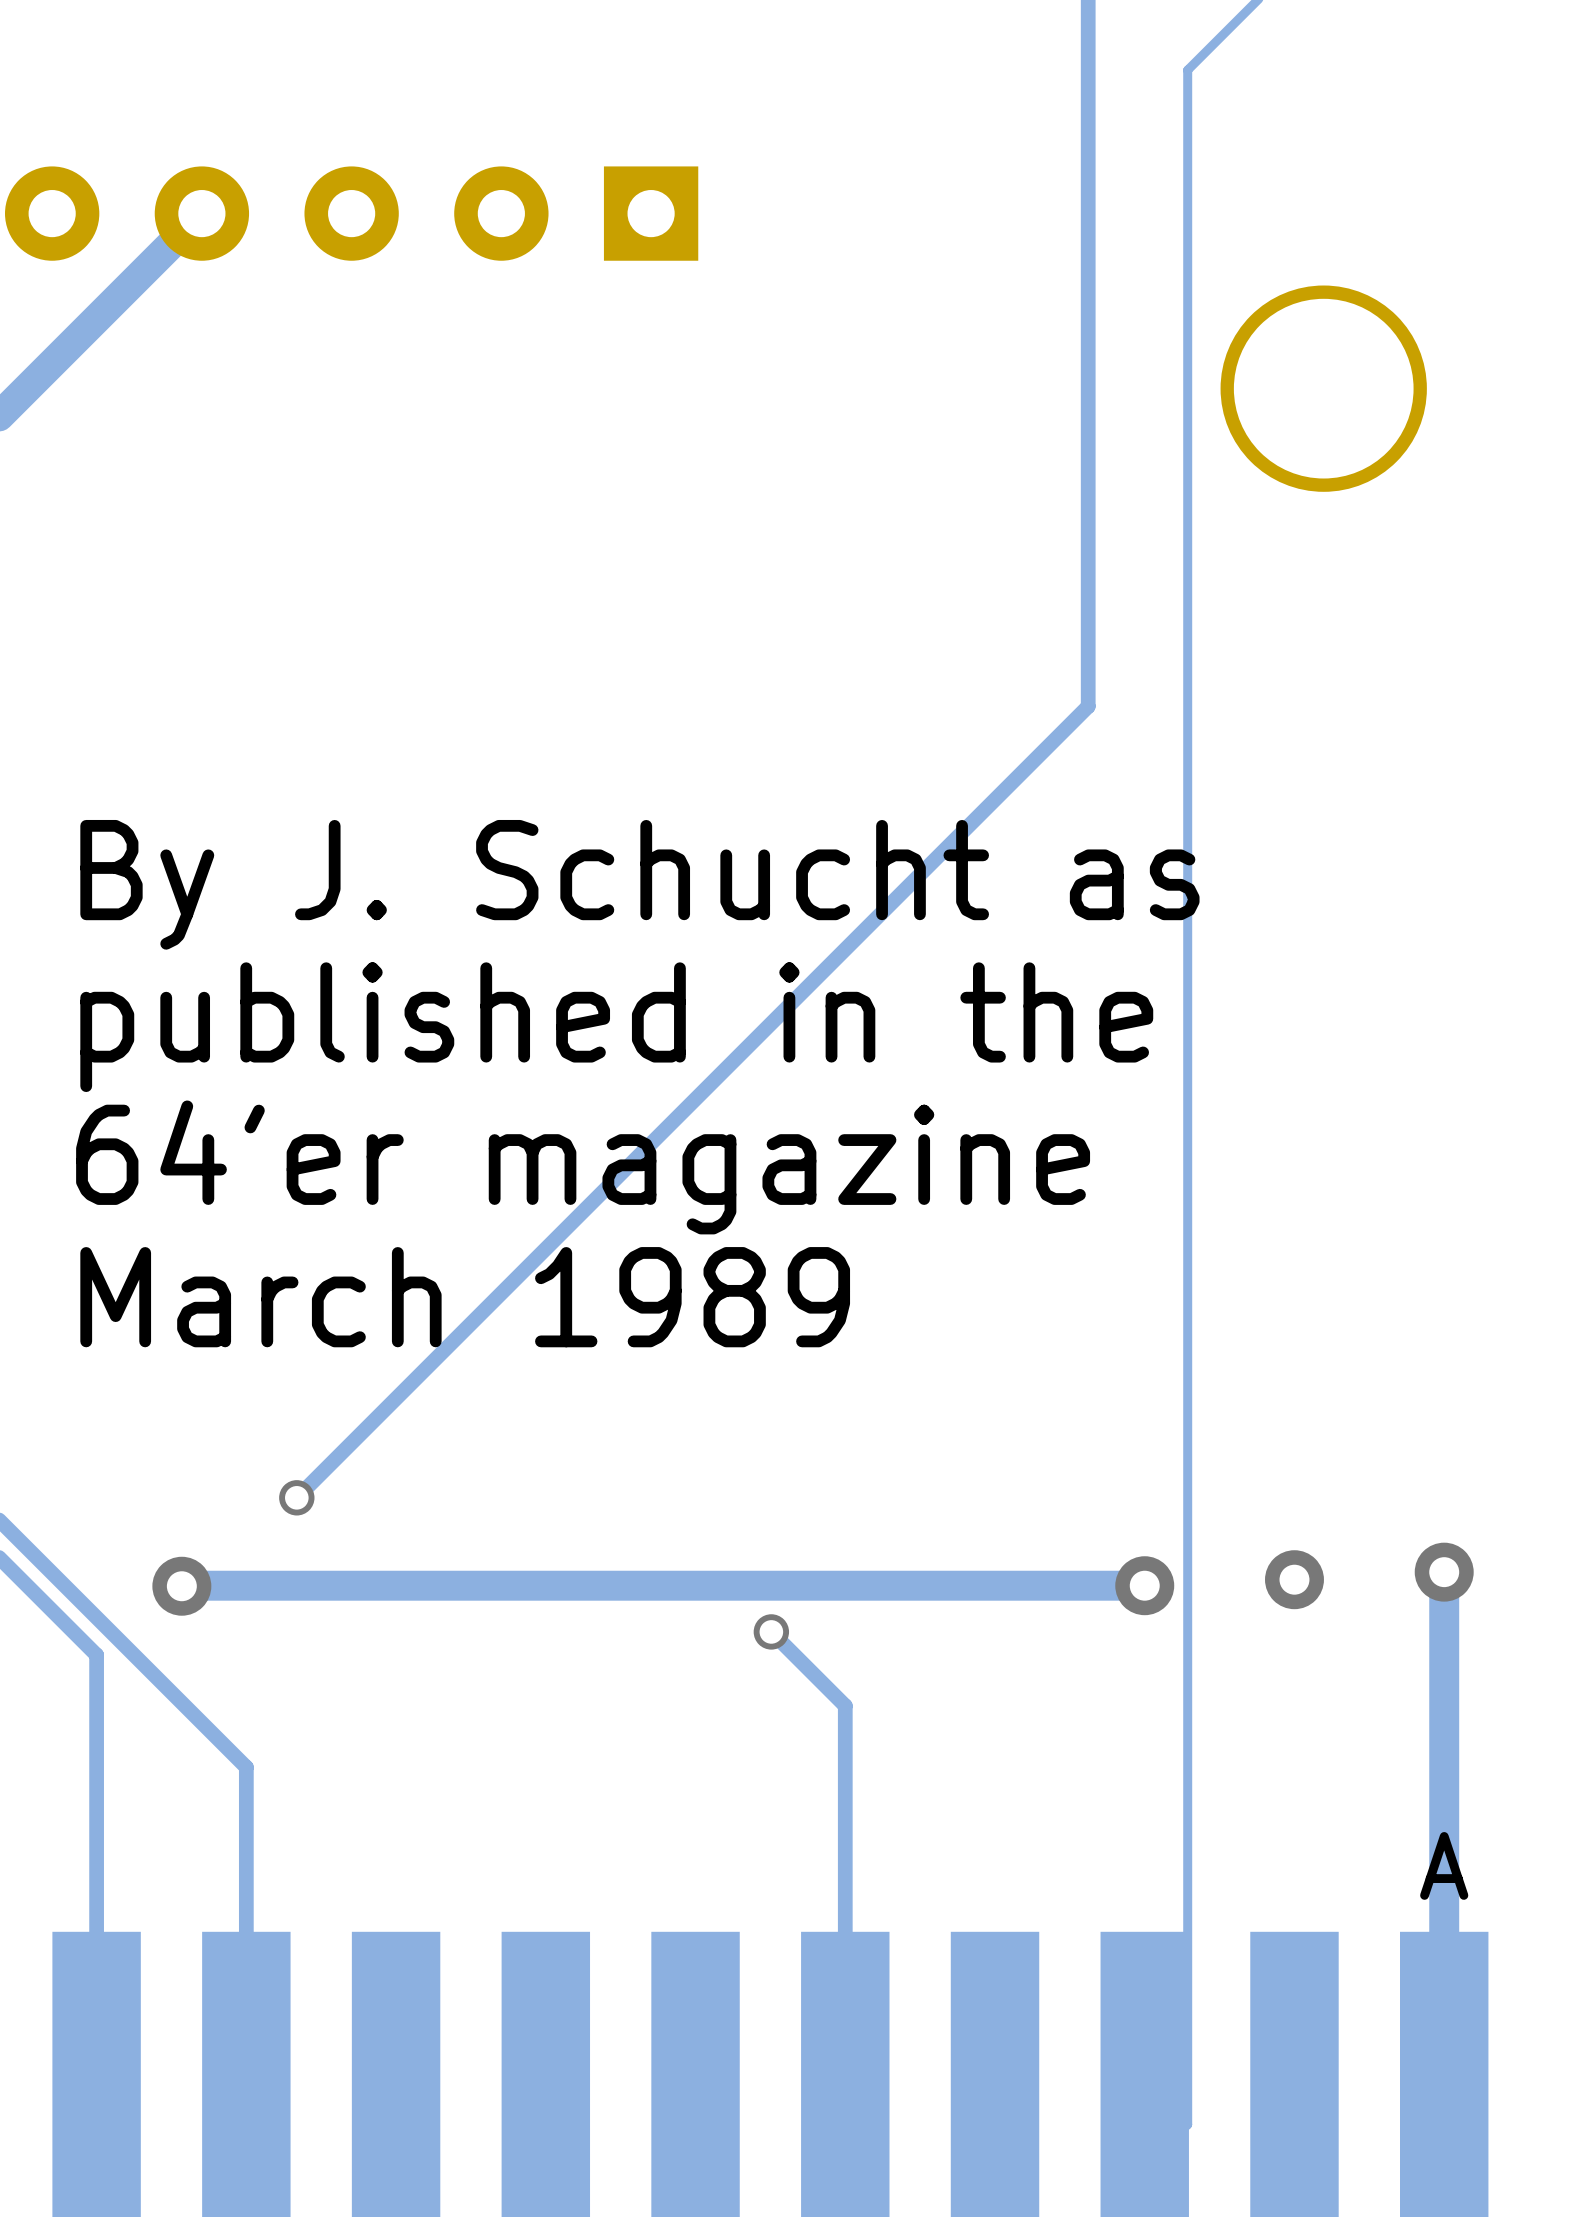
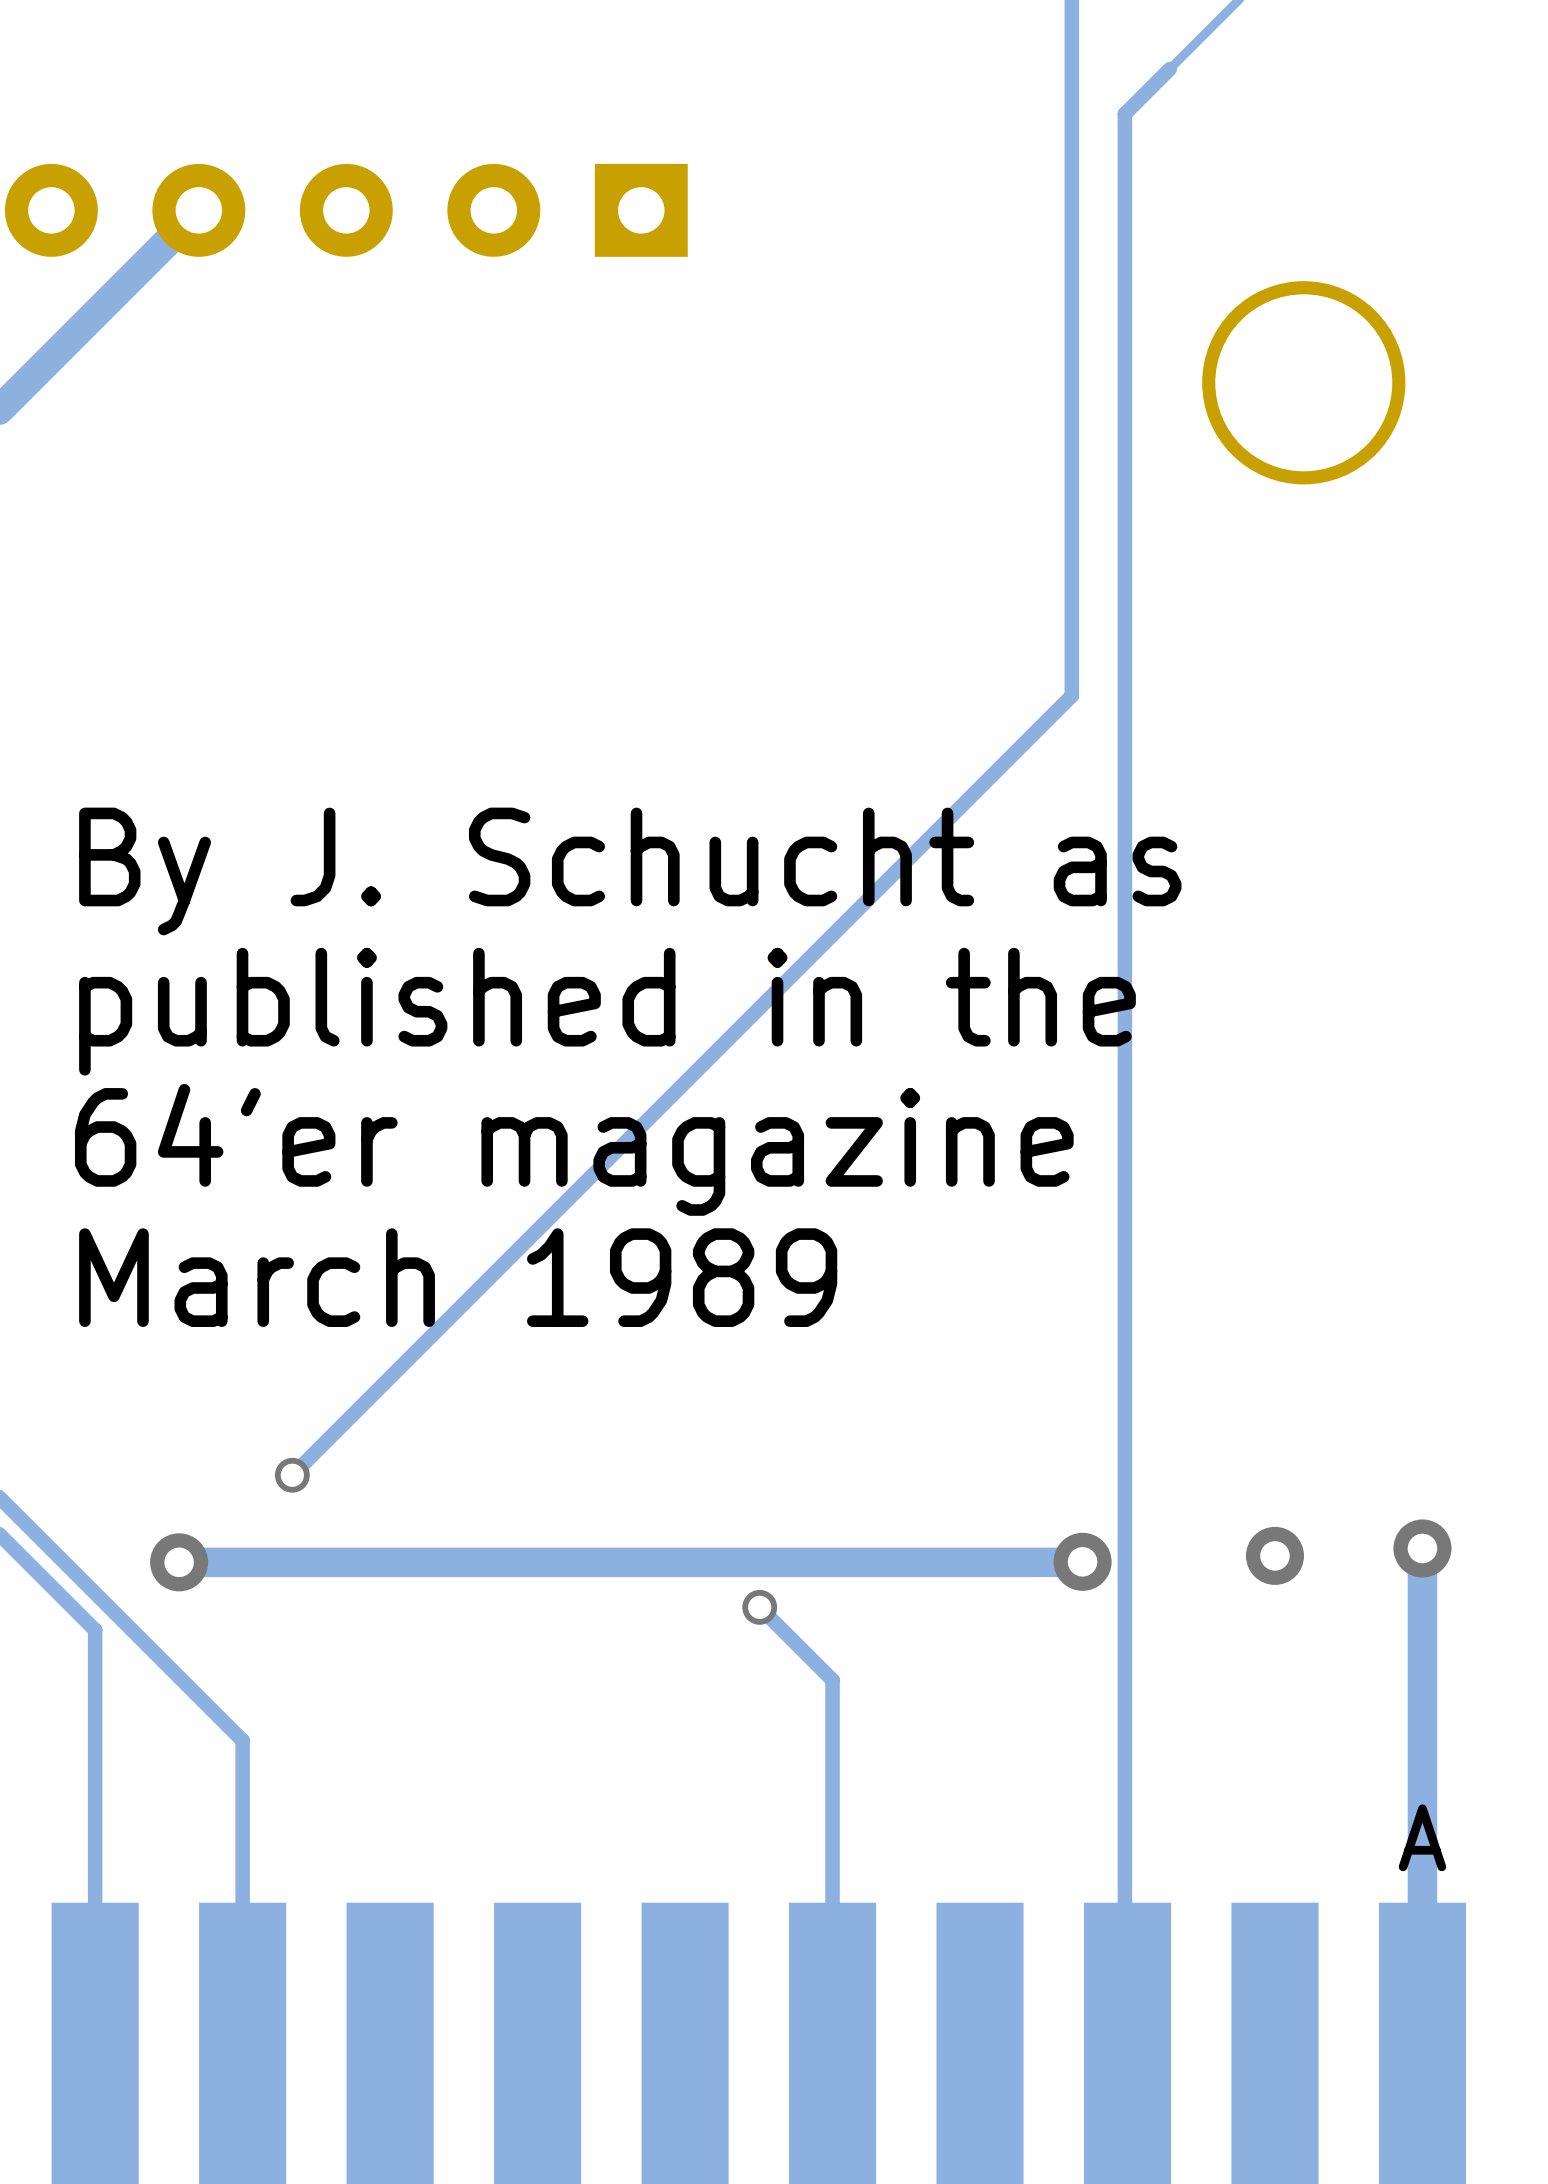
track: (1187, 70) (1187, 2124) (1144, 2167) -> (1169, 69) (1124, 113) (1124, 2132) (1127, 2134)
track: (1144, 1585) (182, 1585) -> (1082, 1562) (179, 1562)
via position: (1144, 1585) -> (1082, 1561)

